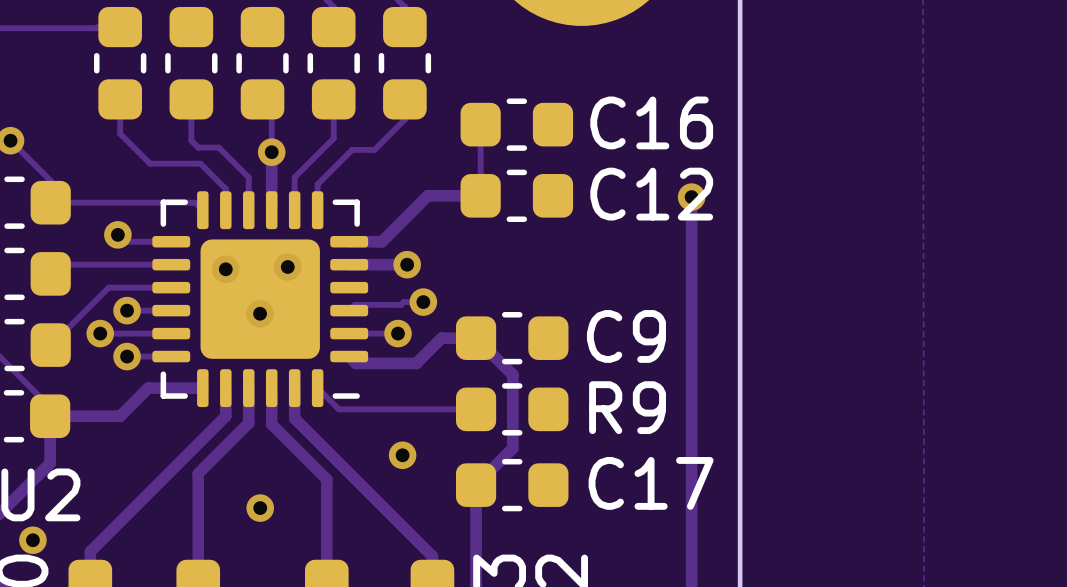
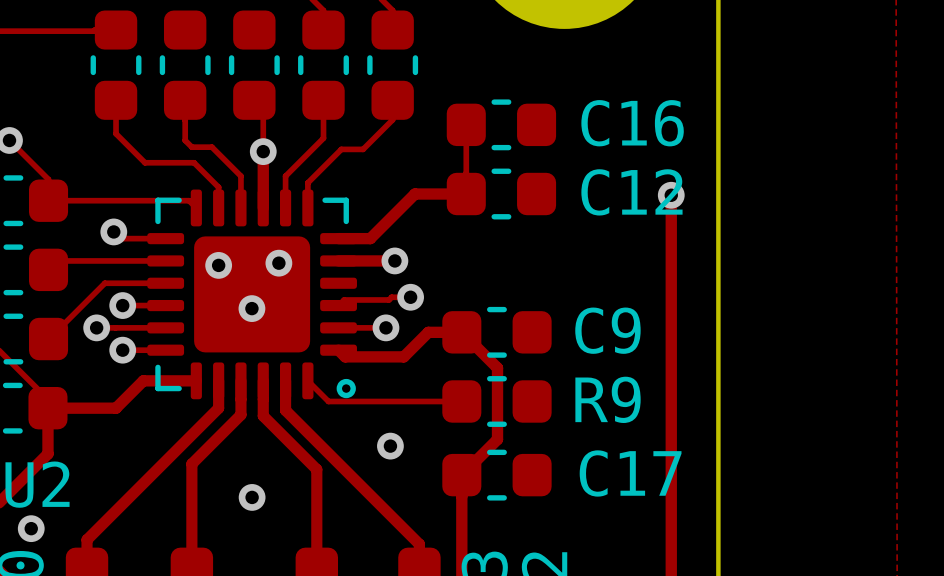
U2 footprint: [152, 191, 369, 408] -> [147, 189, 357, 400]

